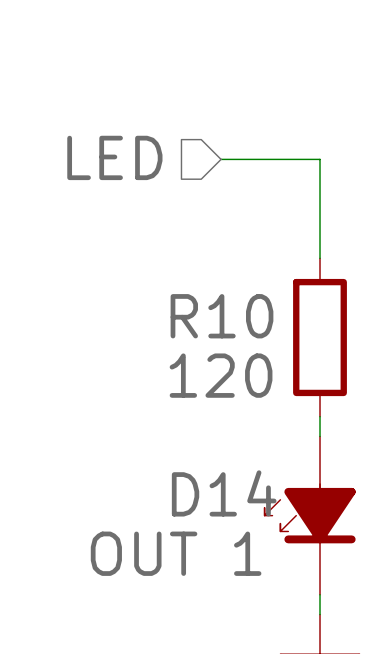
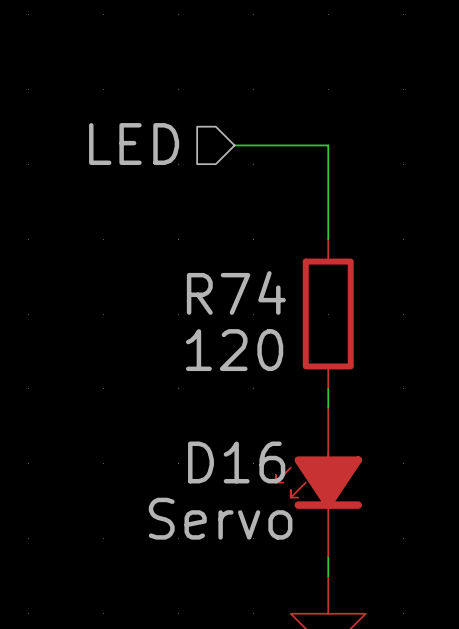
R10 name: R10 (221, 316) -> R74 (236, 293)
D14 name: D14 (224, 493) -> D16 (236, 462)
D14 value: OUT 1 (176, 553) -> Servo (220, 518)

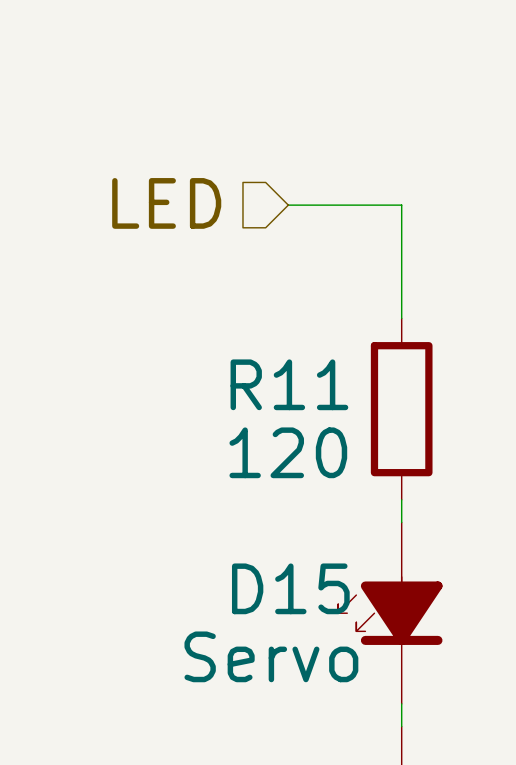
R74 name: R74 (236, 293) -> R11 (289, 384)
D16 name: D16 (236, 462) -> D15 (290, 588)

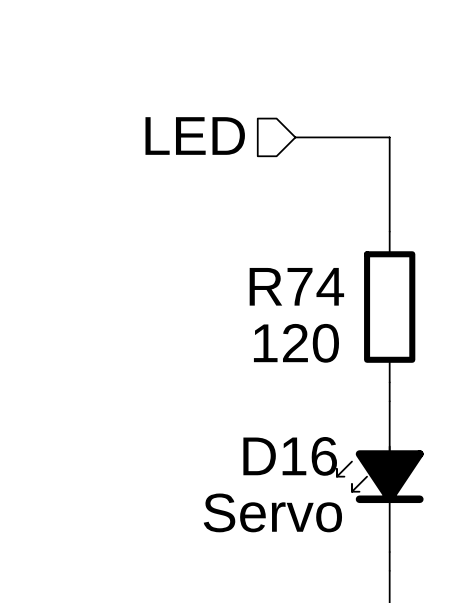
R11 name: R11 (289, 384) -> R74 (296, 286)
D15 name: D15 (290, 588) -> D16 (290, 456)

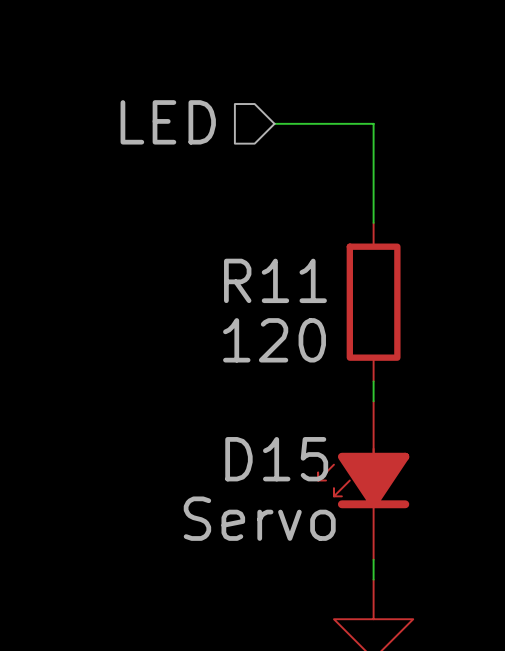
R74 name: R74 (296, 286) -> R11 (275, 280)
D16 name: D16 (290, 456) -> D15 (276, 459)

